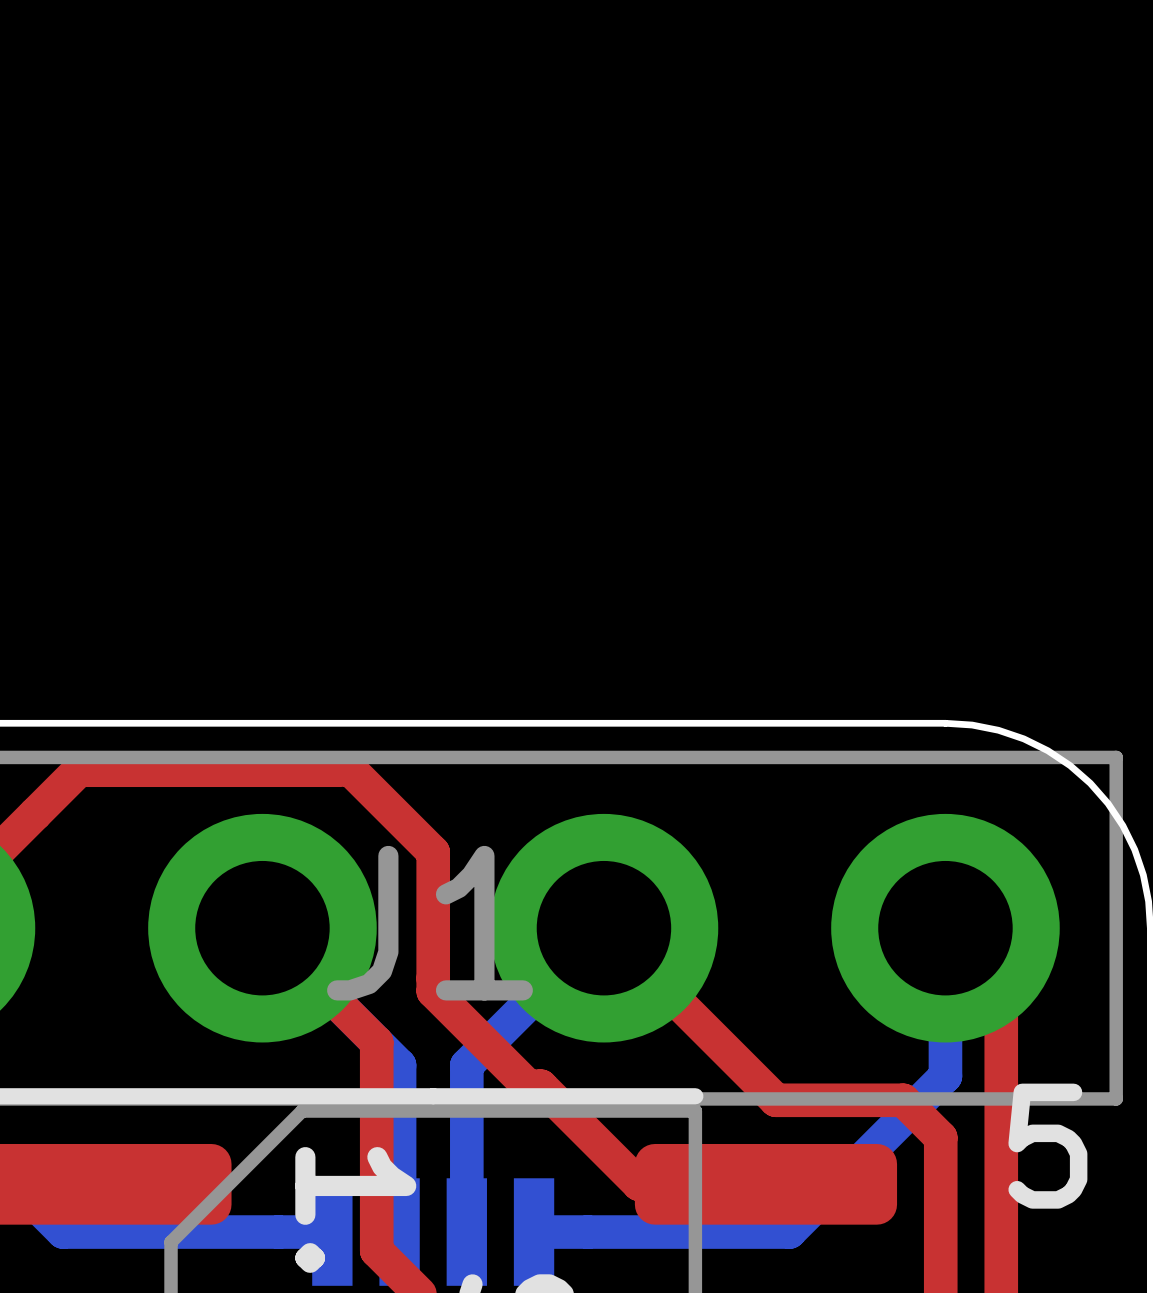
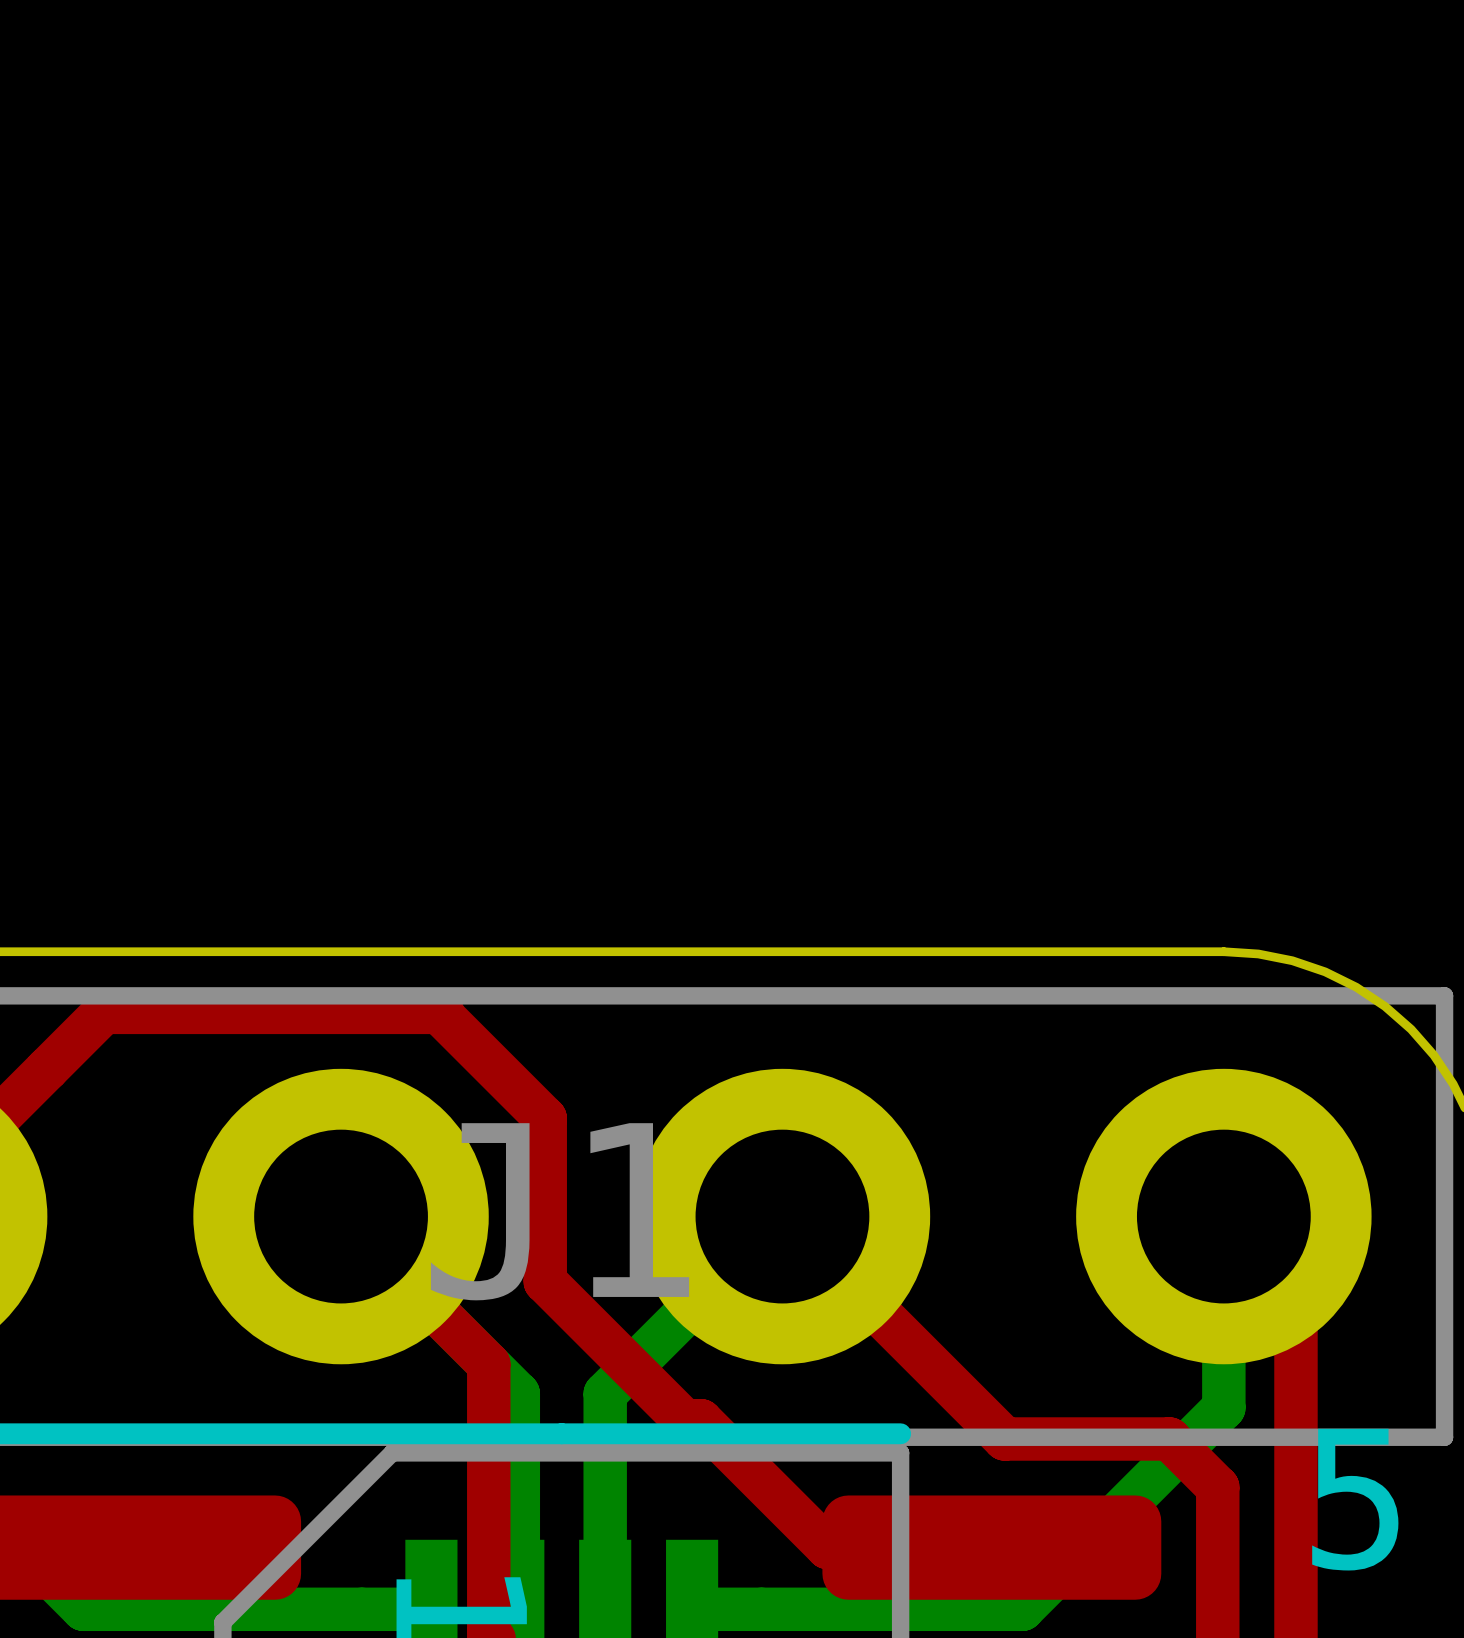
top track: (351, 770) (433, 852) (433, 991) -> (439, 1012) (545, 1118) (545, 1281) (561, 1298)

